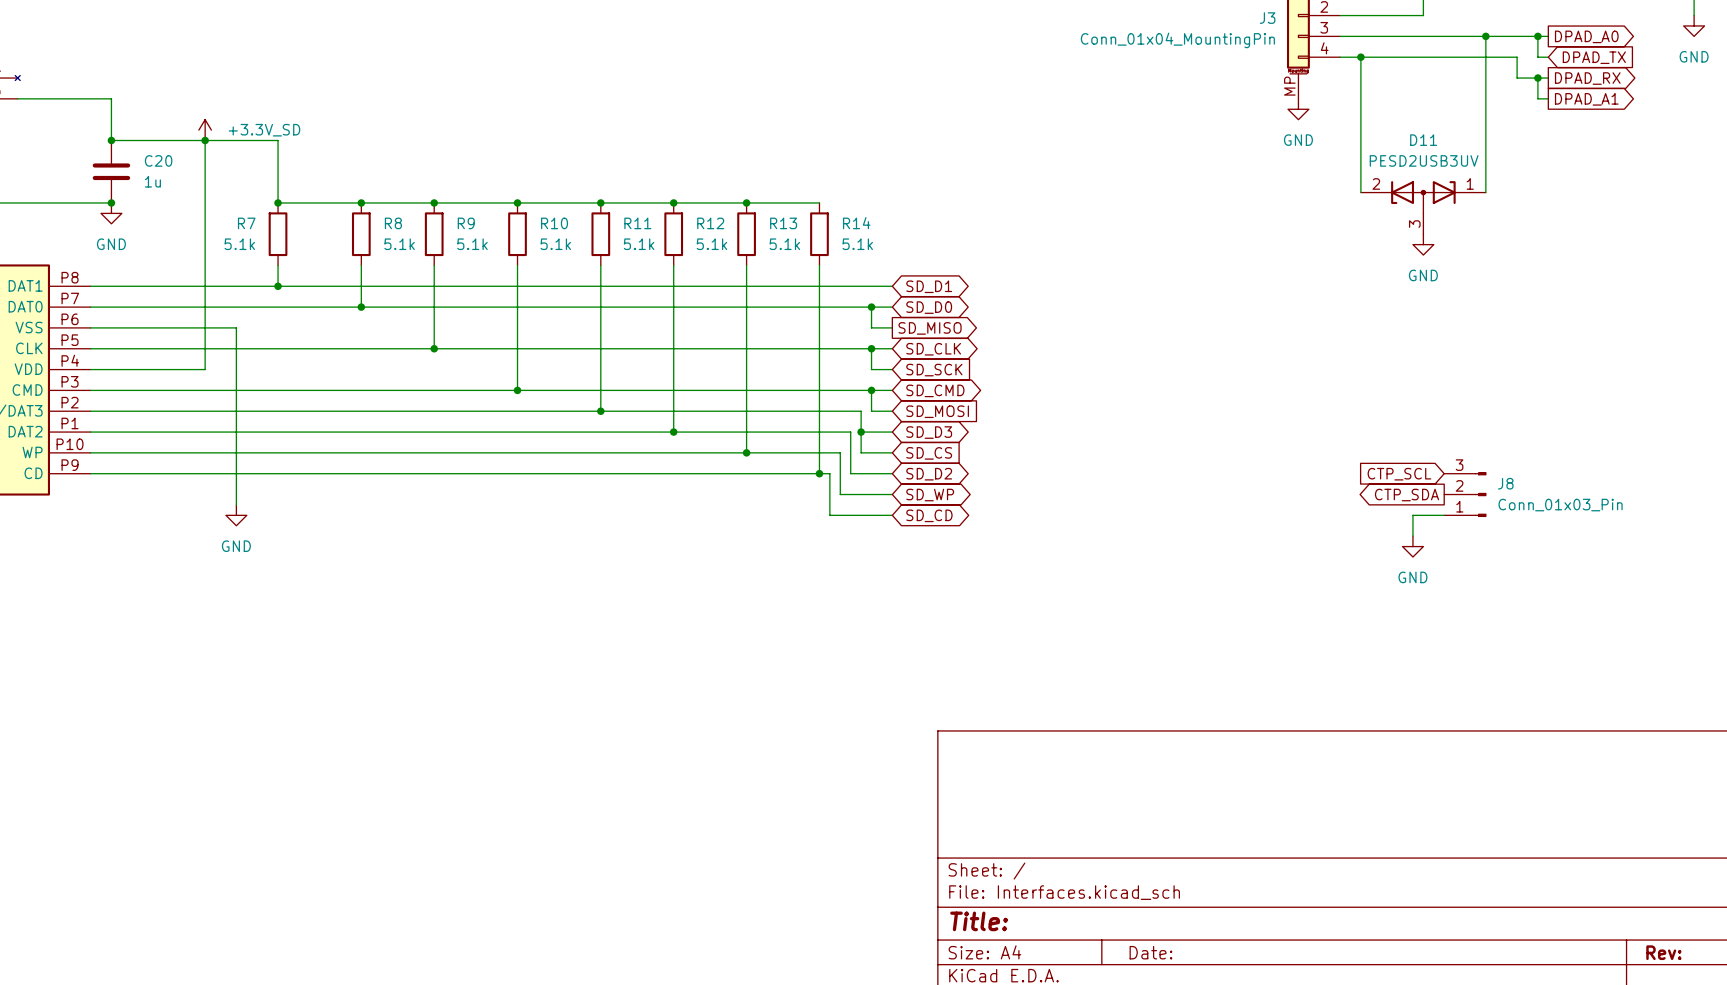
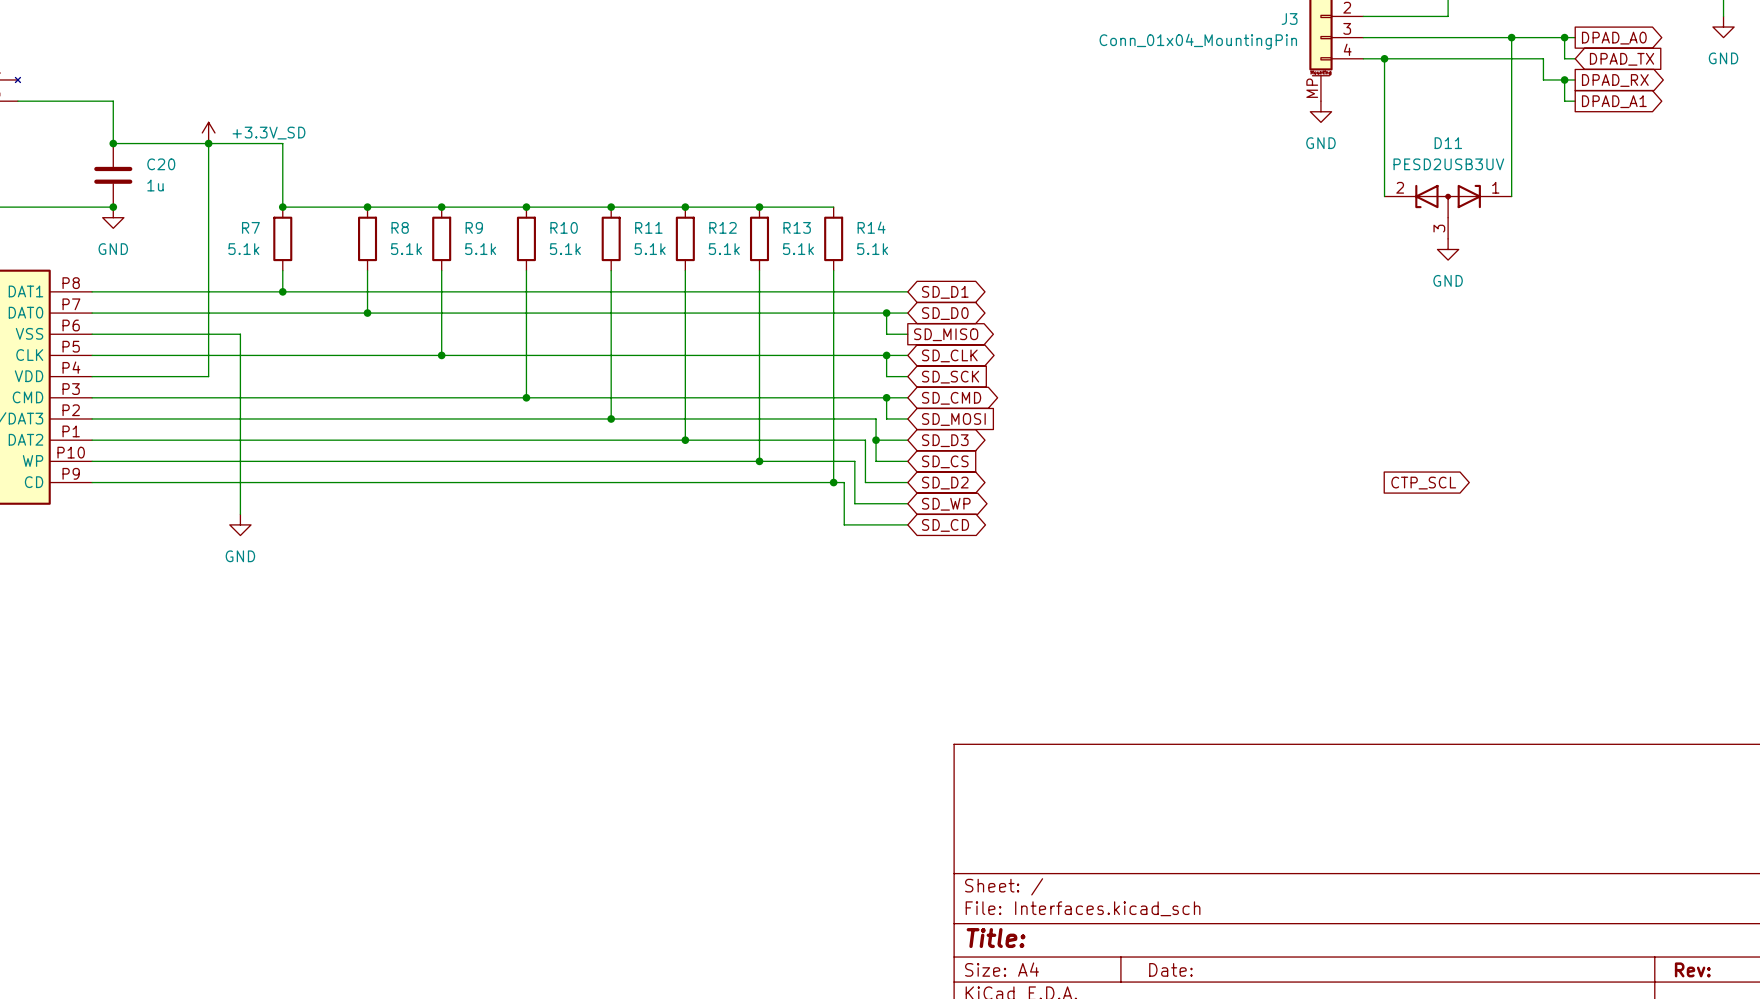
J8: Conn_01x03_Pin (1465, 494) -> none
global label: CTP_SDA (1407, 495) -> none
wire: (1444, 515) (1412, 515) (1412, 536) -> none
power symbol: GND (1412, 546) -> none

